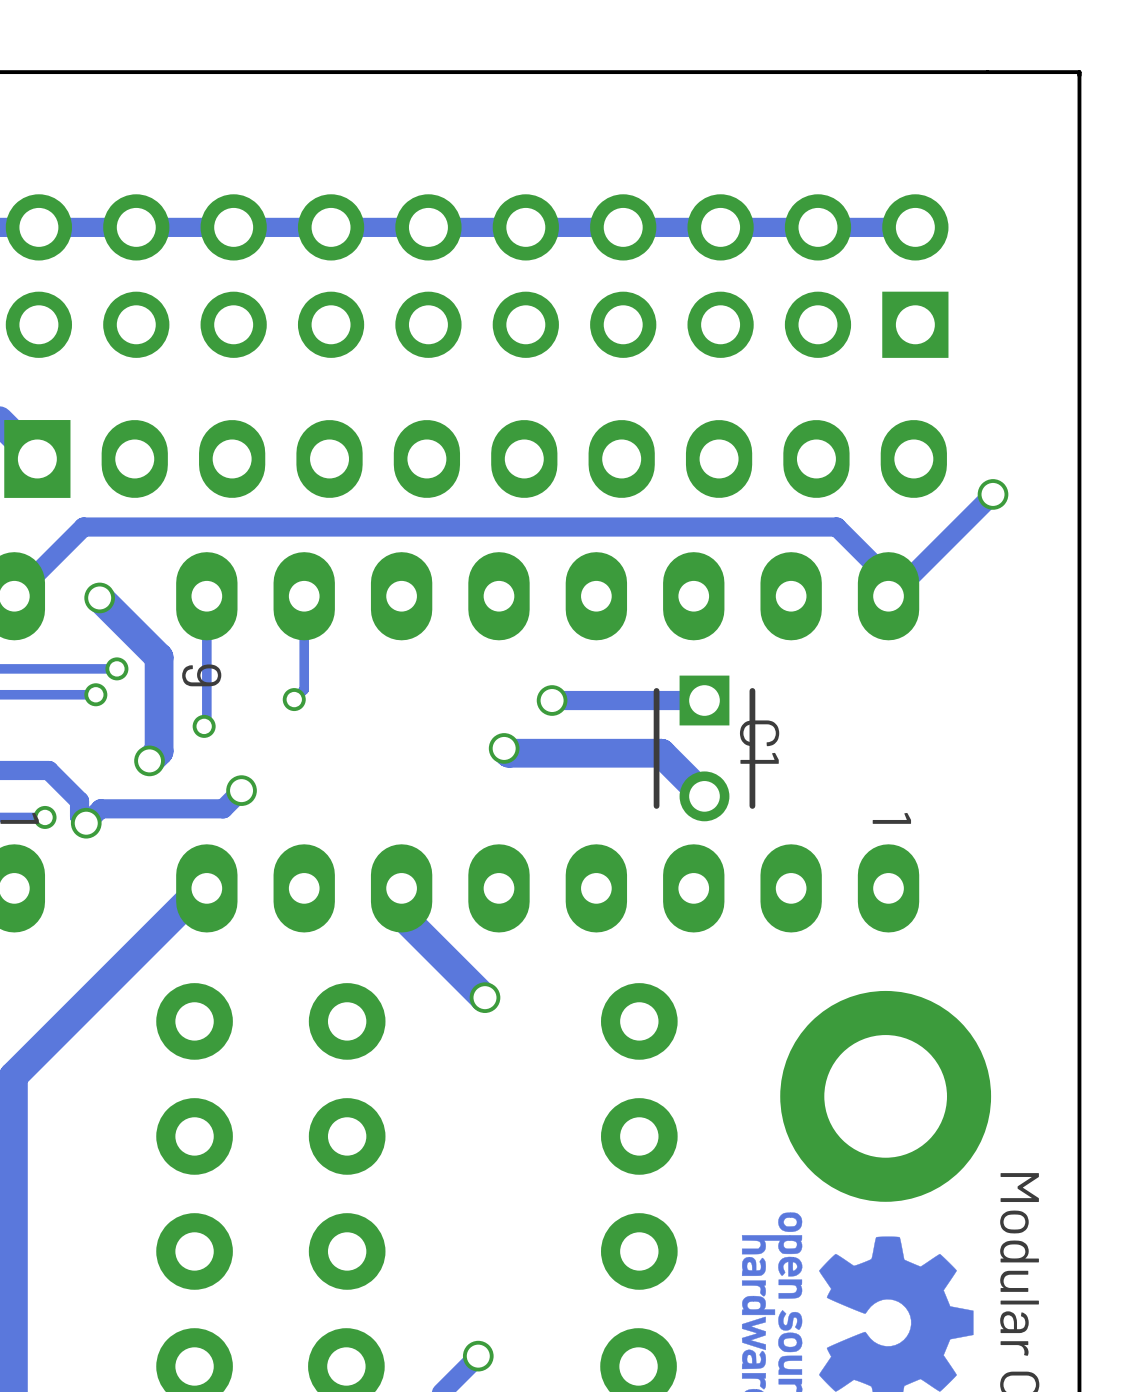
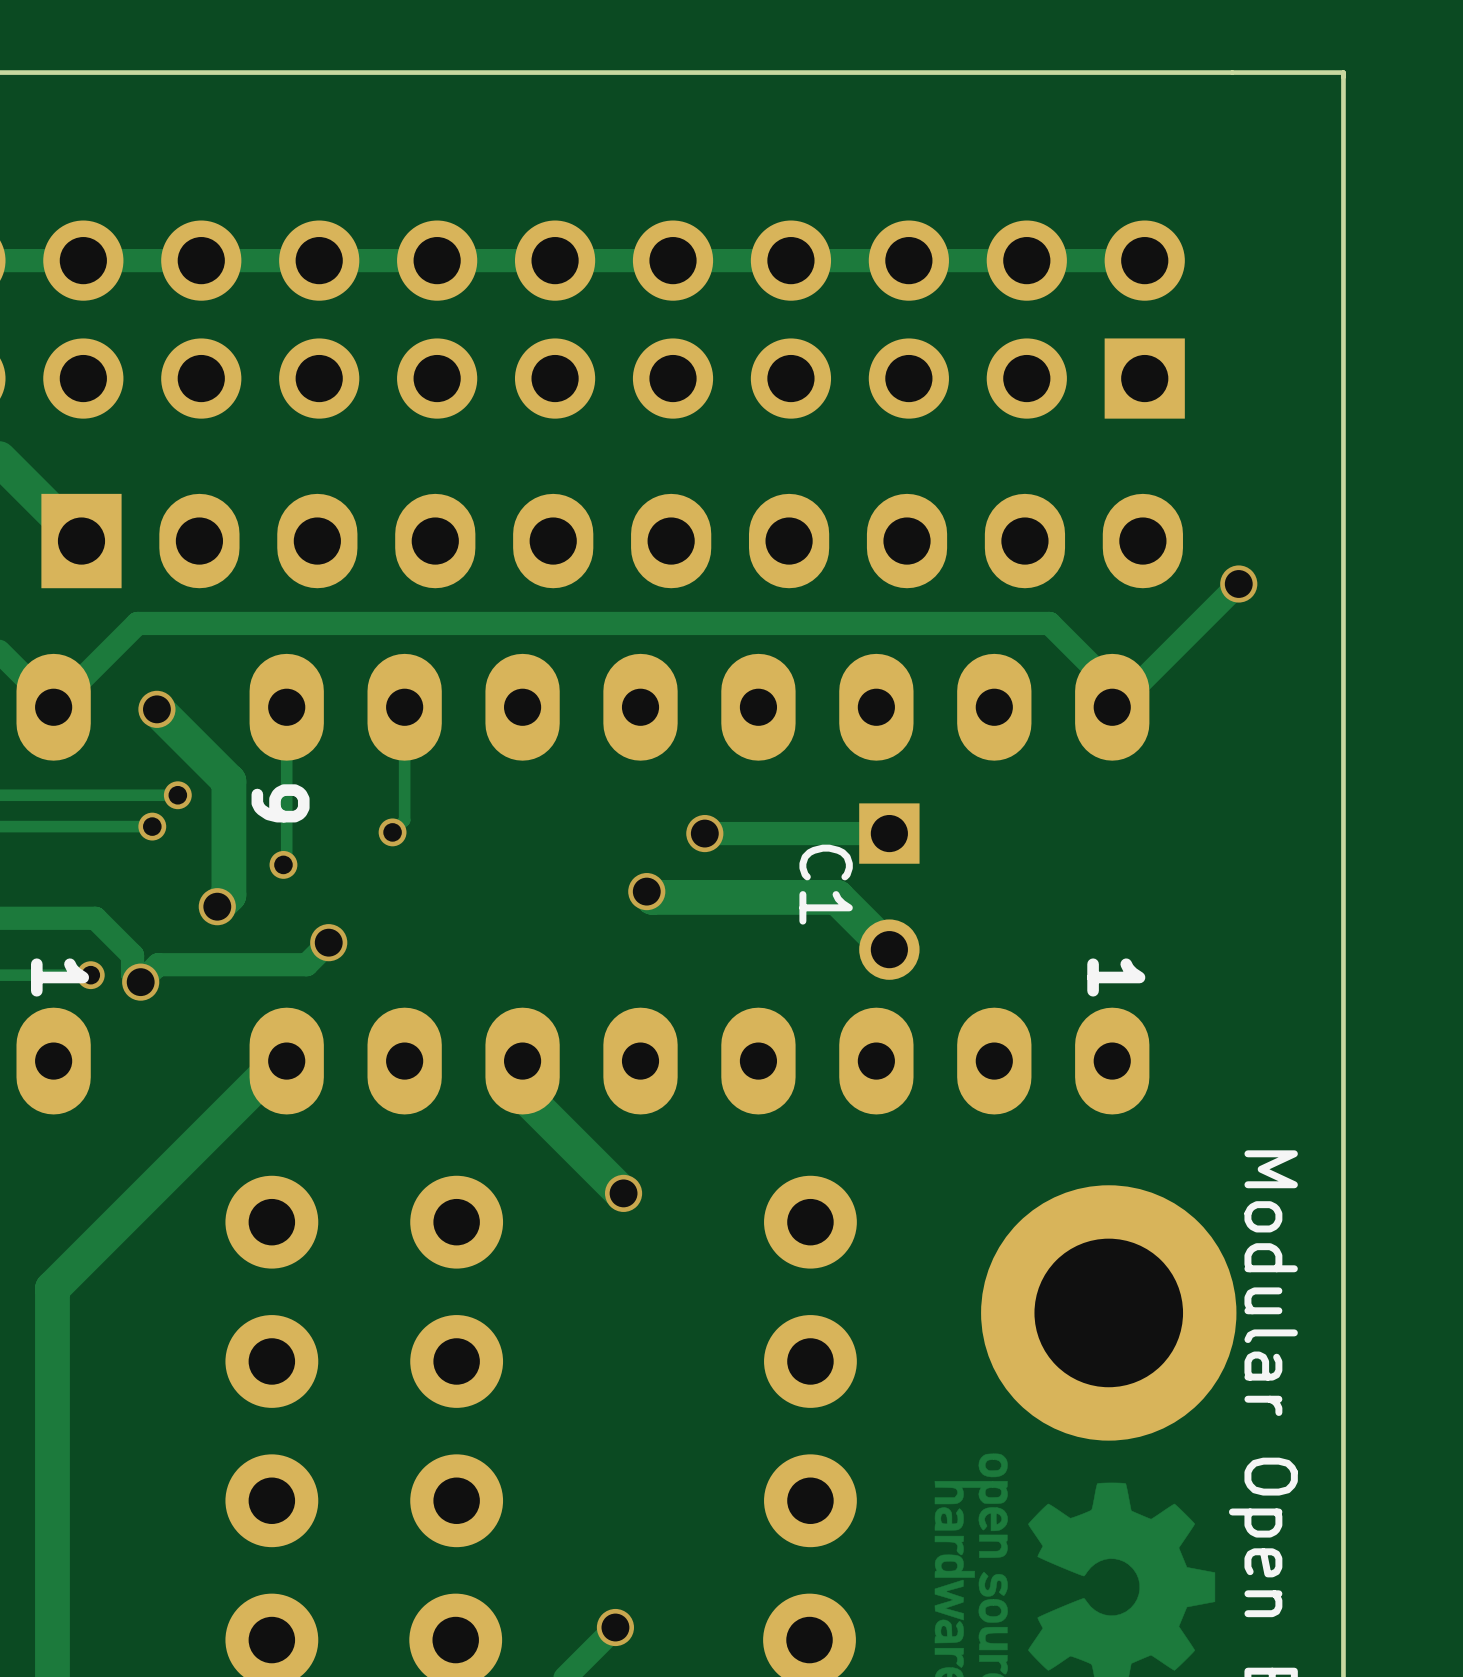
C1 side: bottom (704, 748) -> top (889, 891)

